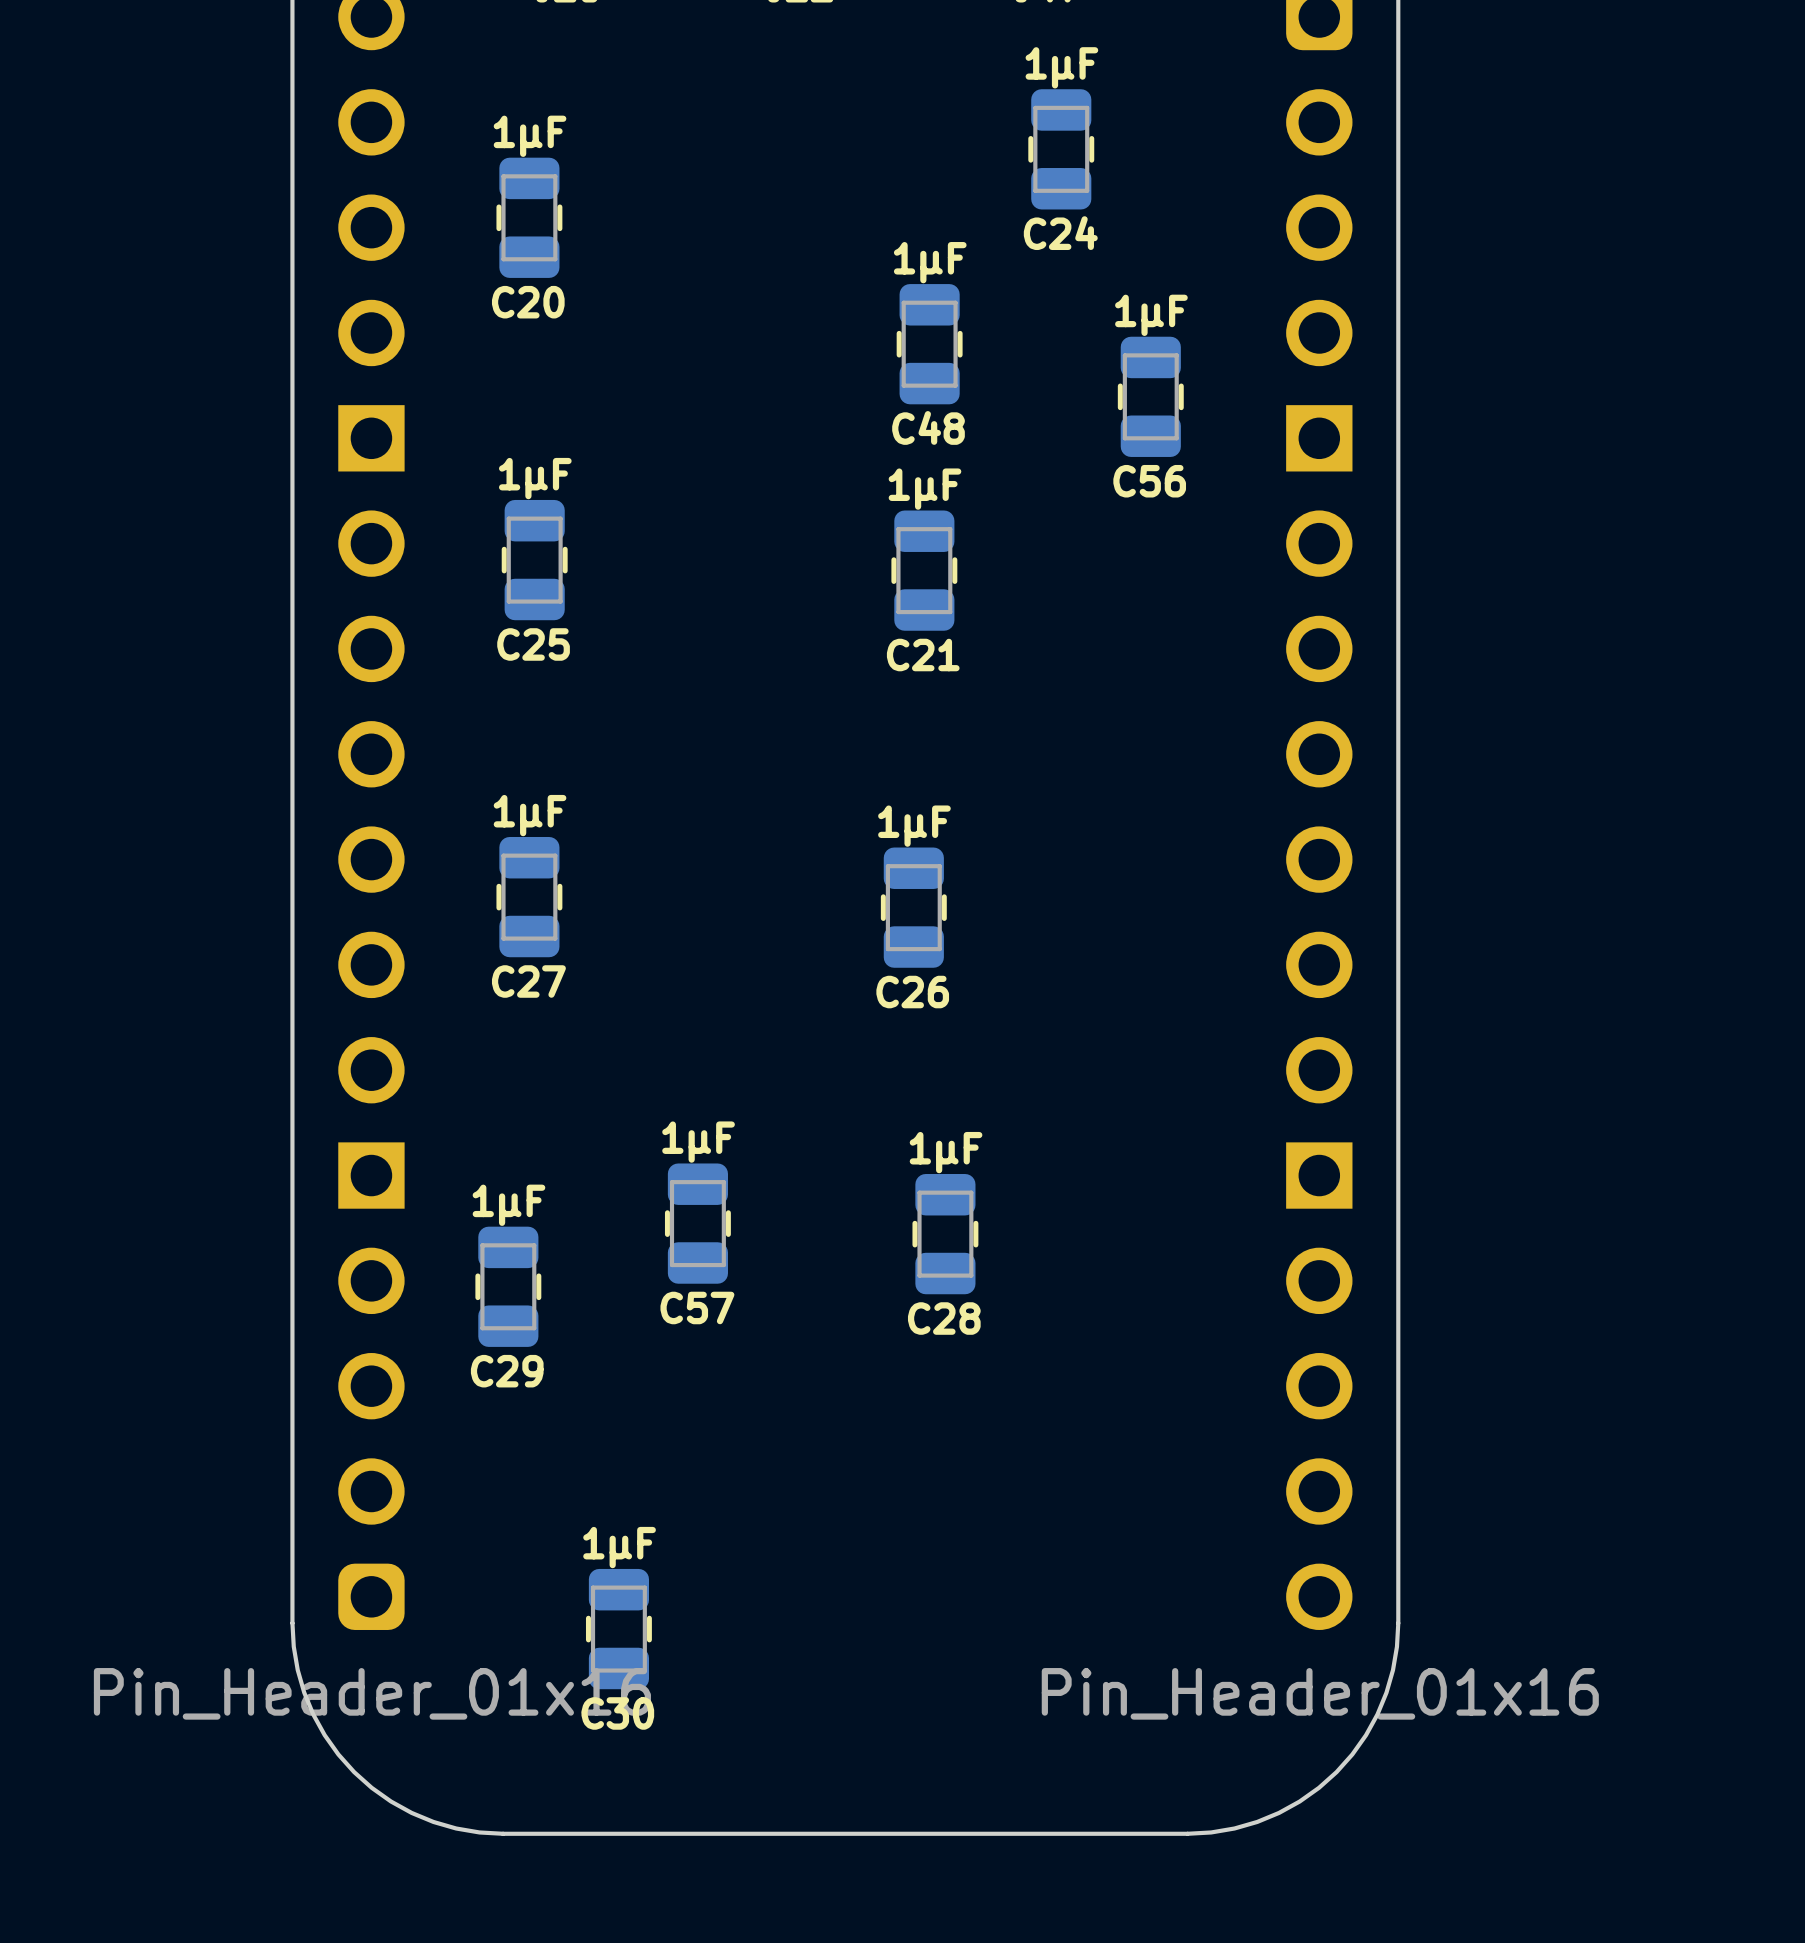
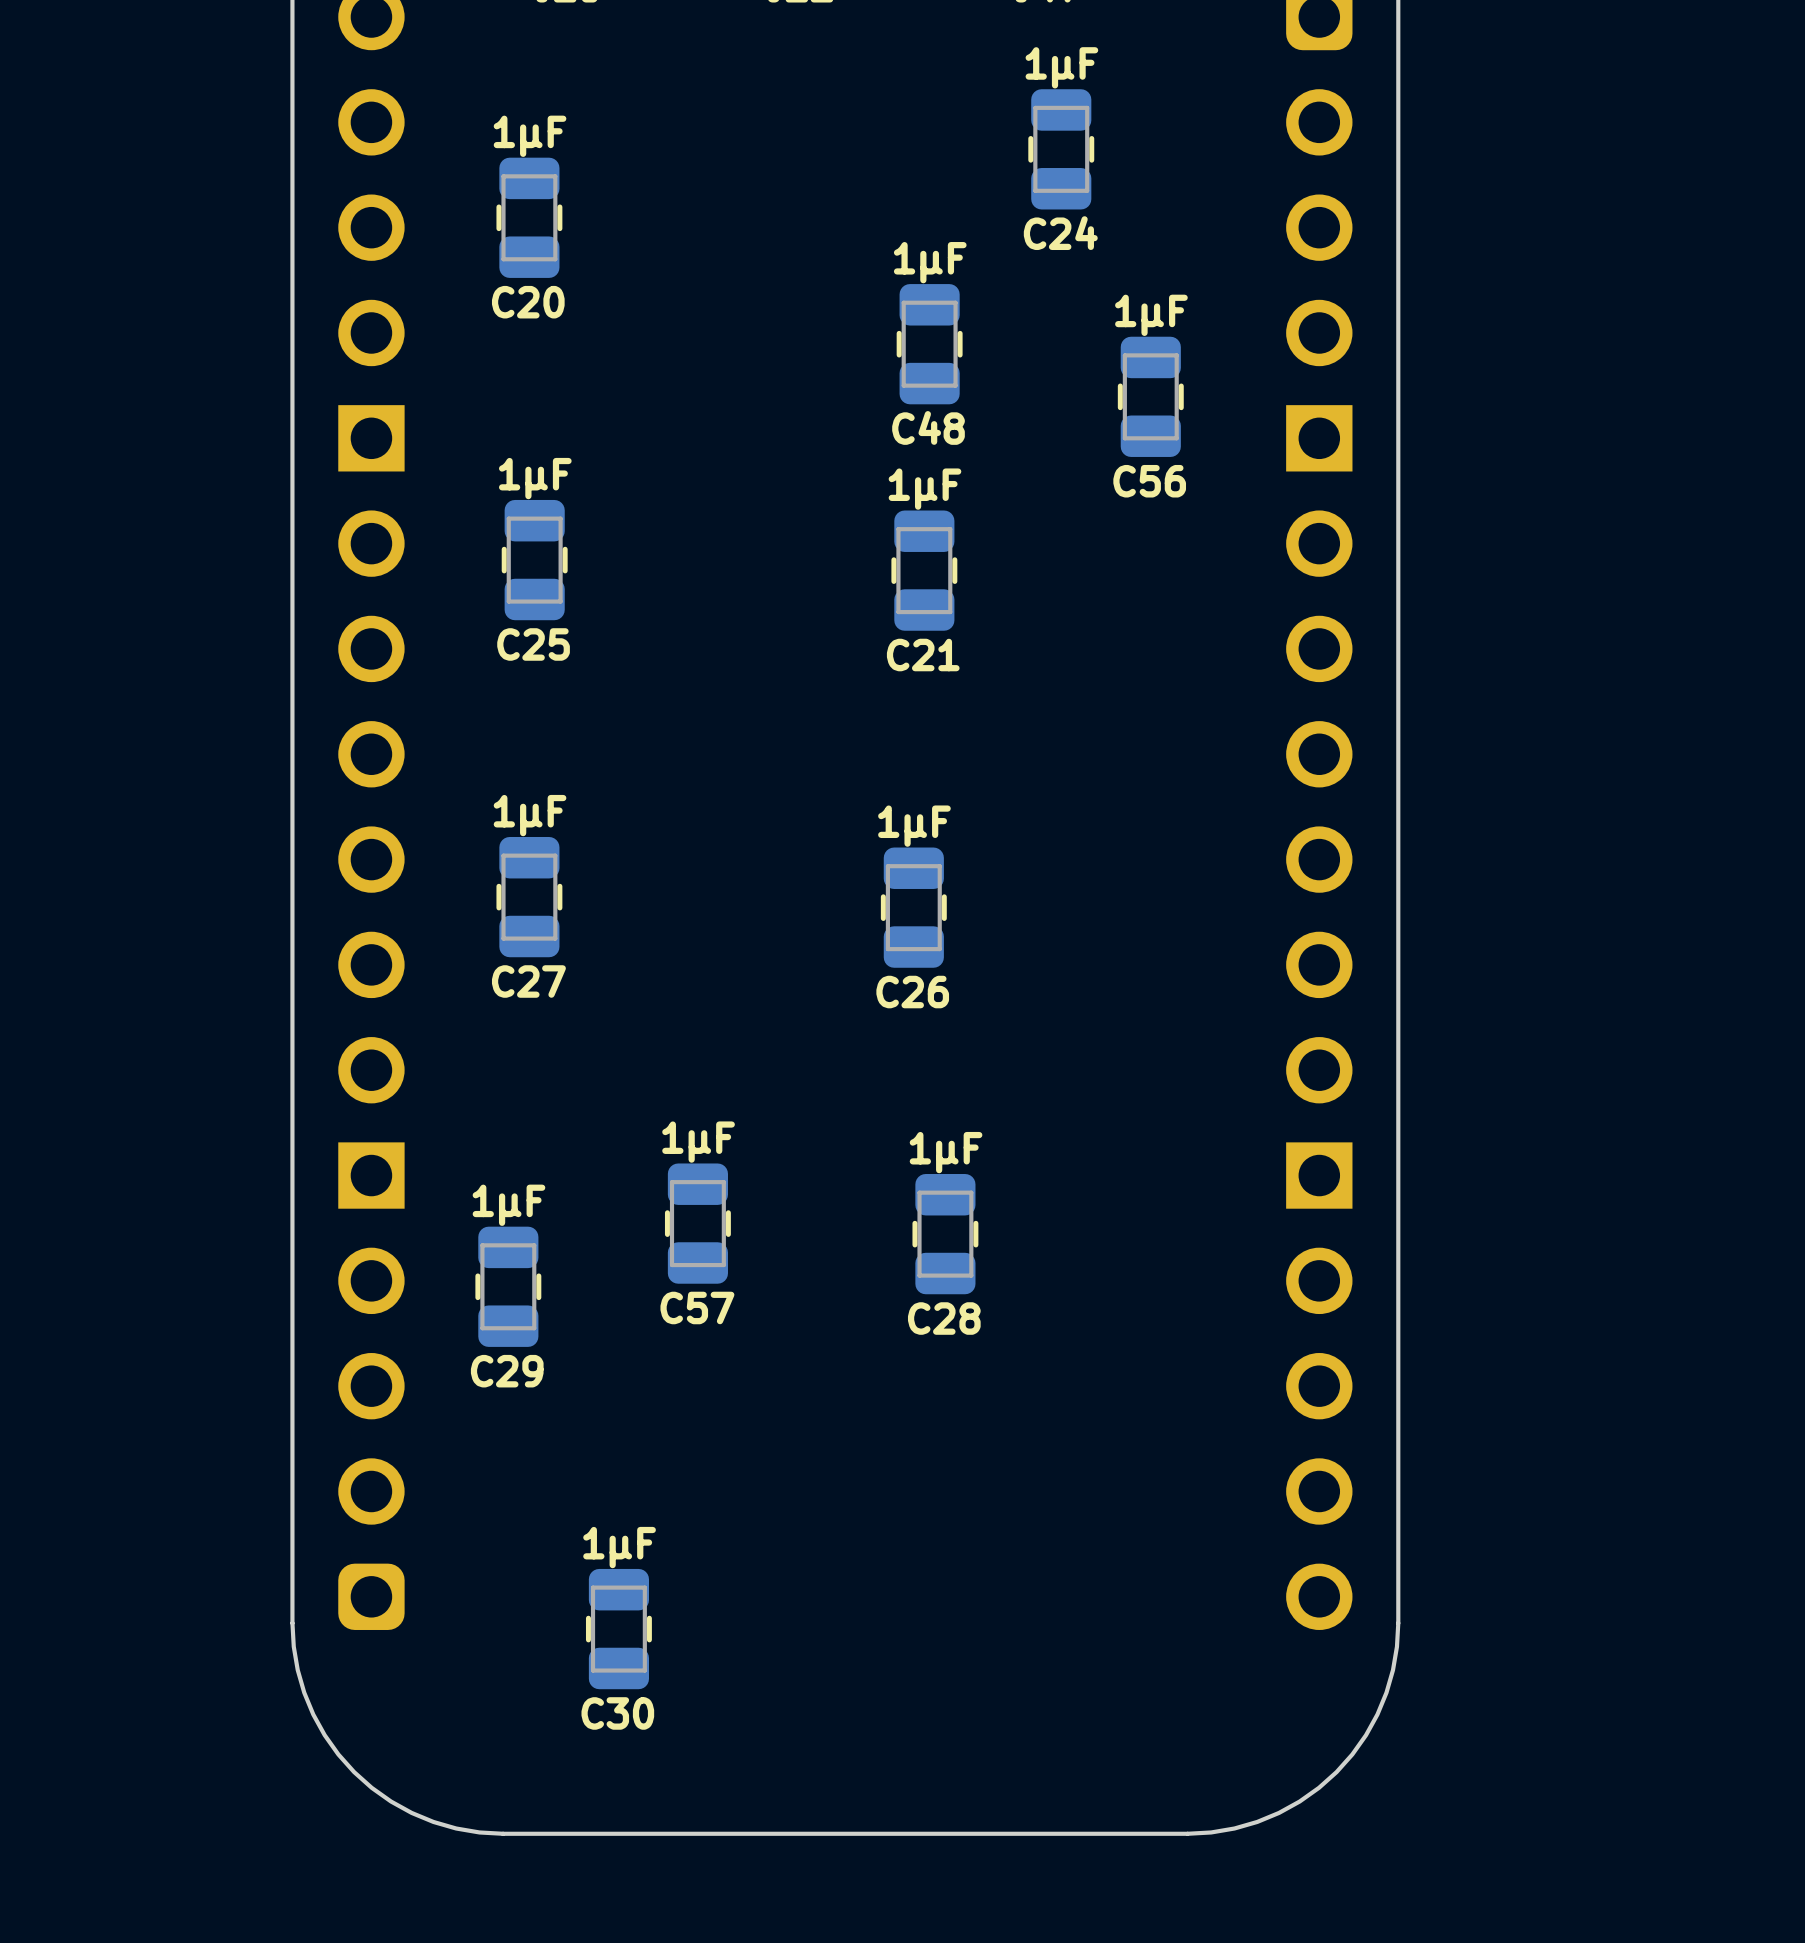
drawing: [93, 1668, 651, 1720] -> none
drawing: [1041, 1668, 1599, 1720] -> none

